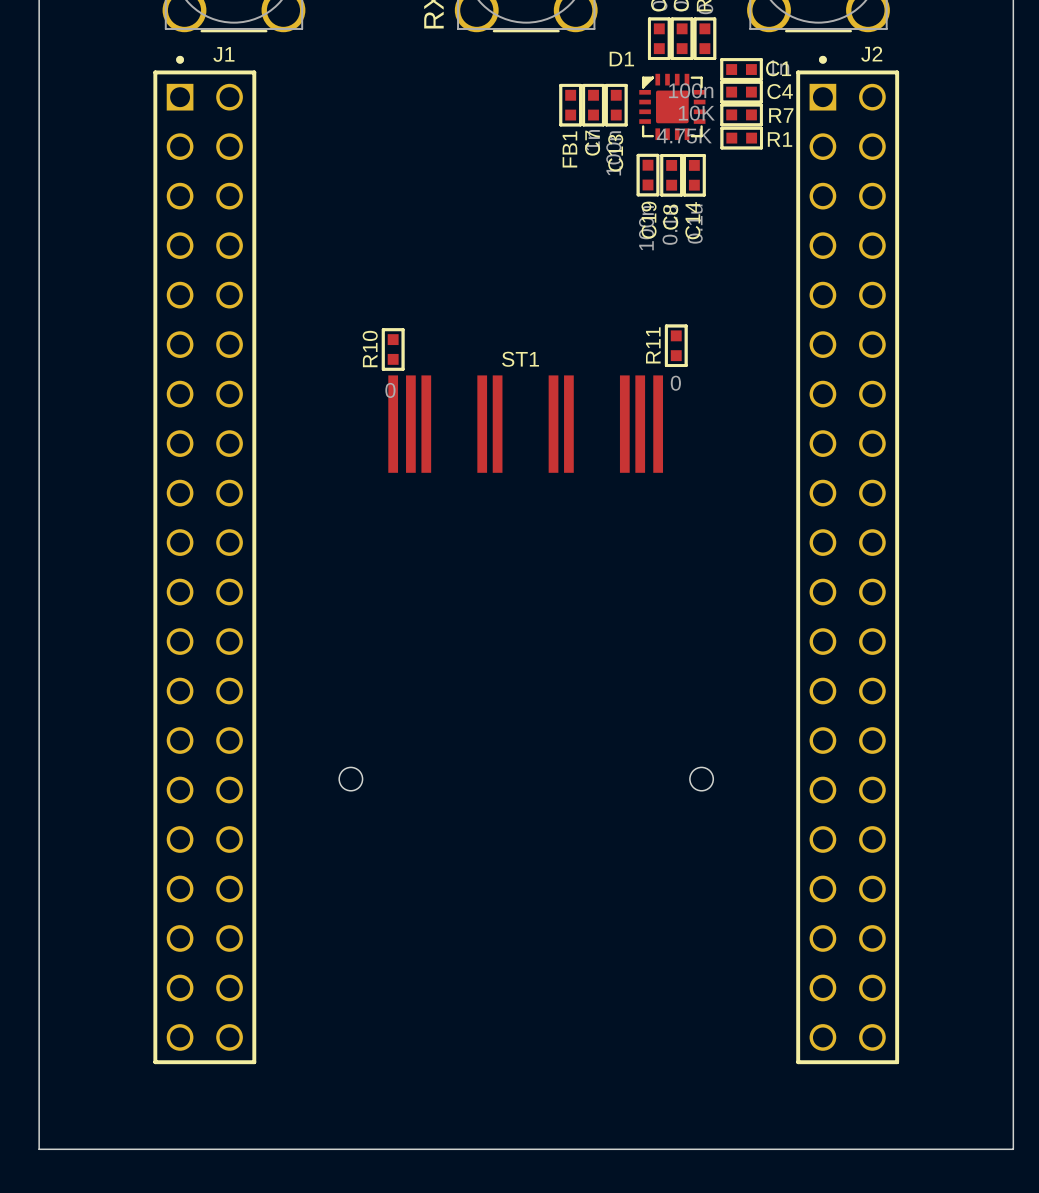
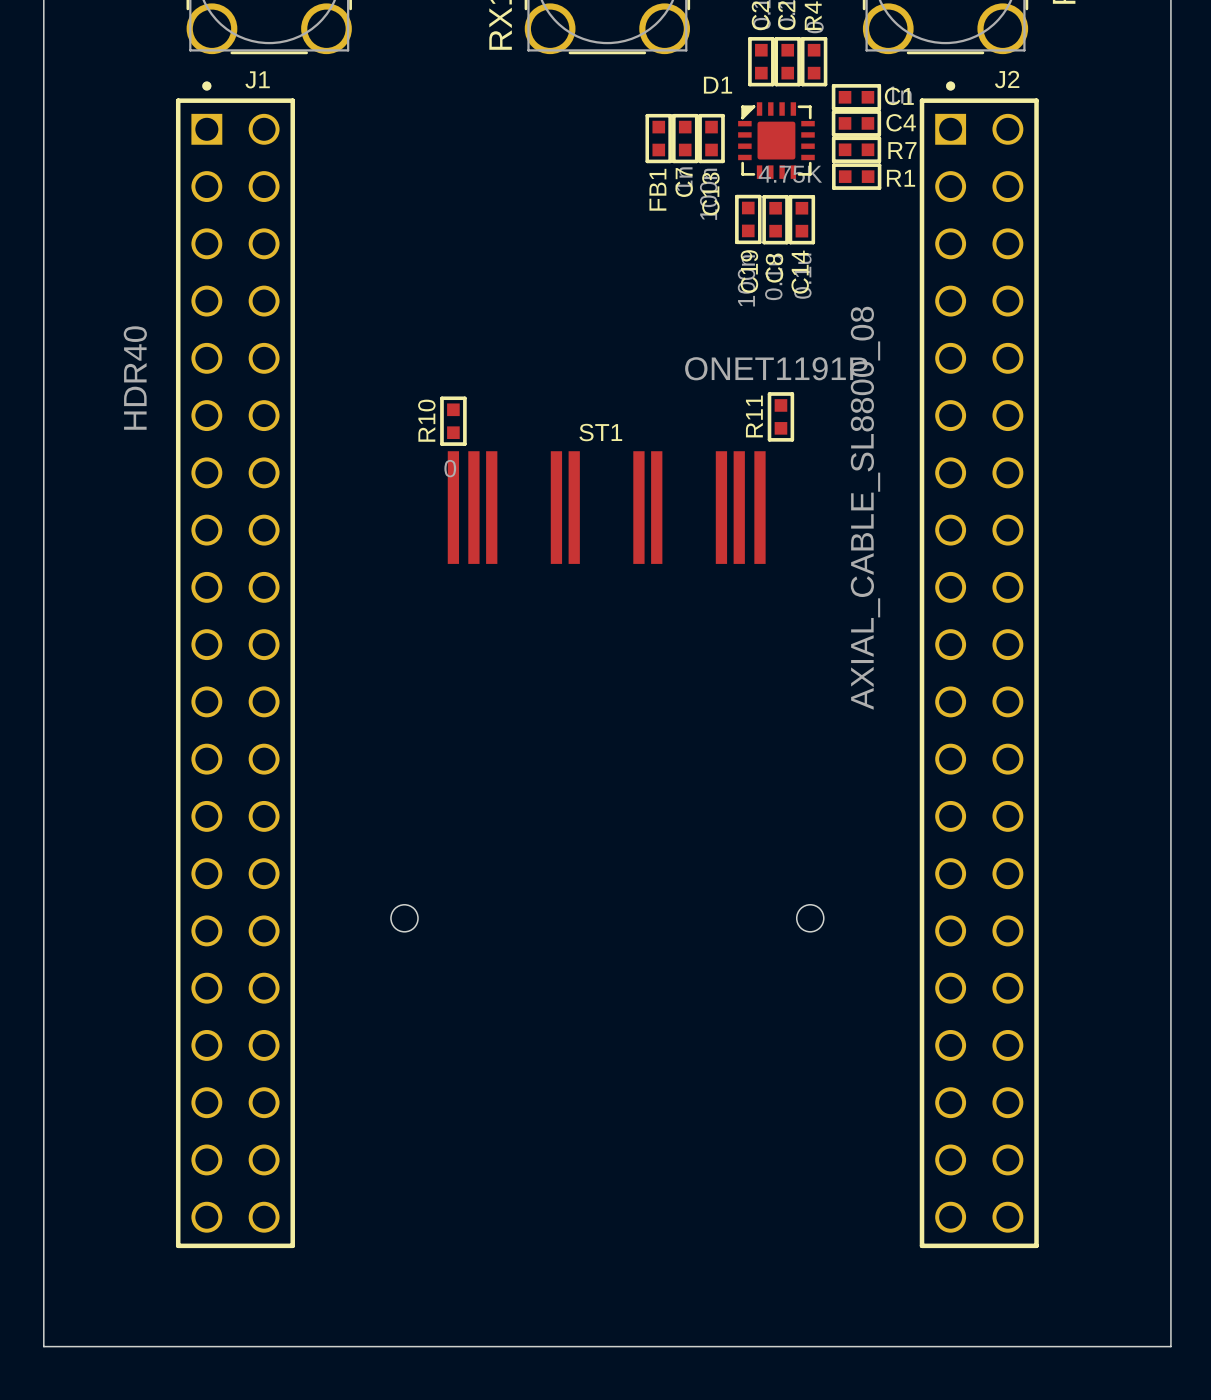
C4 value: 100n (691, 90) -> none
R7 value: 10K (696, 113) -> none
D1 value: none -> ONET1191P (776, 368)
J1 value: none -> HDR40 (135, 378)
R11 value: 0 (675, 383) -> none
ST1 value: none -> AXIAL_CABLE_SL8800_08 (865, 508)

